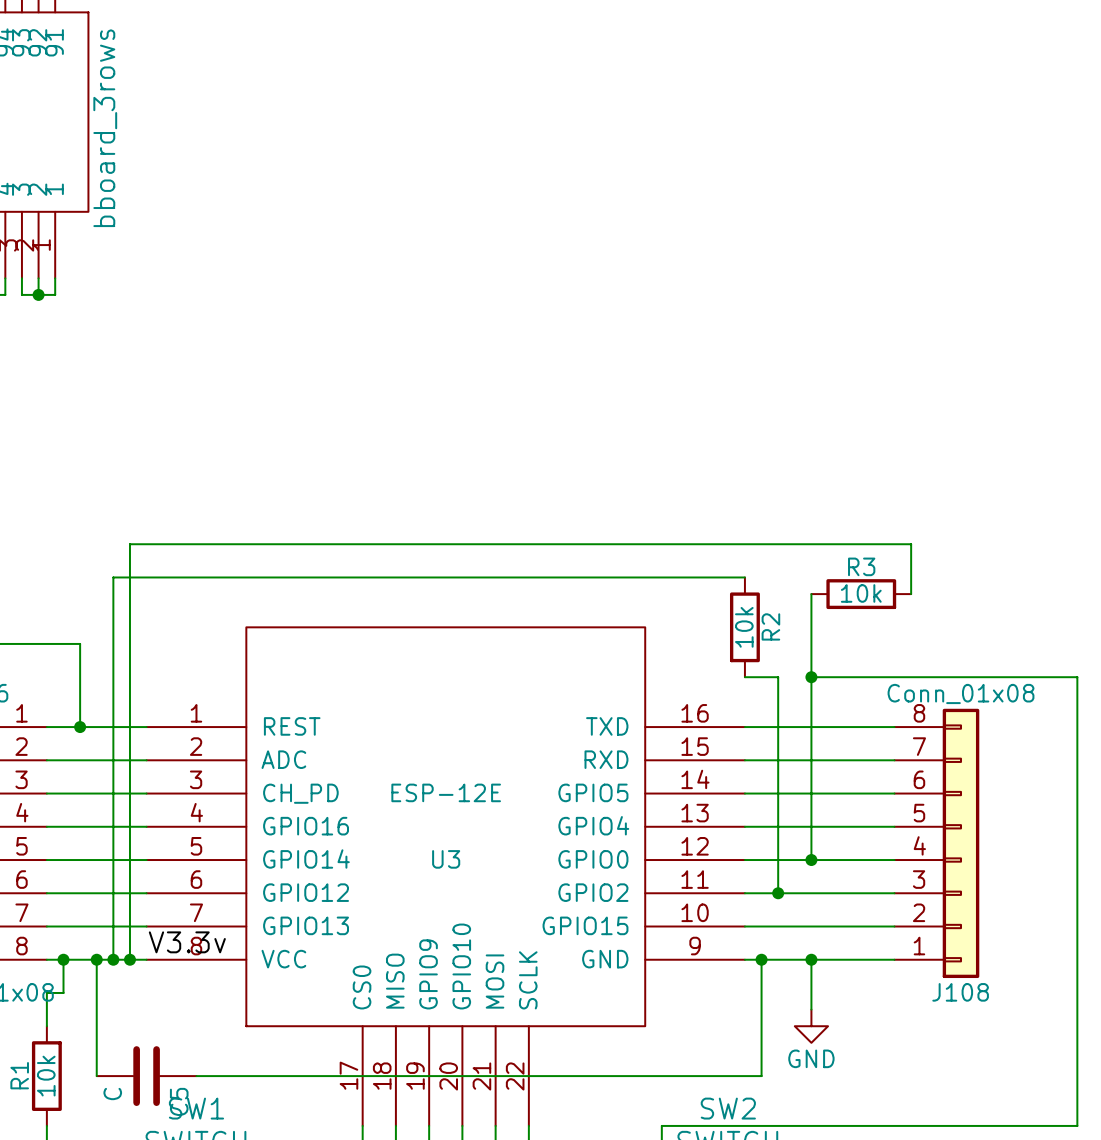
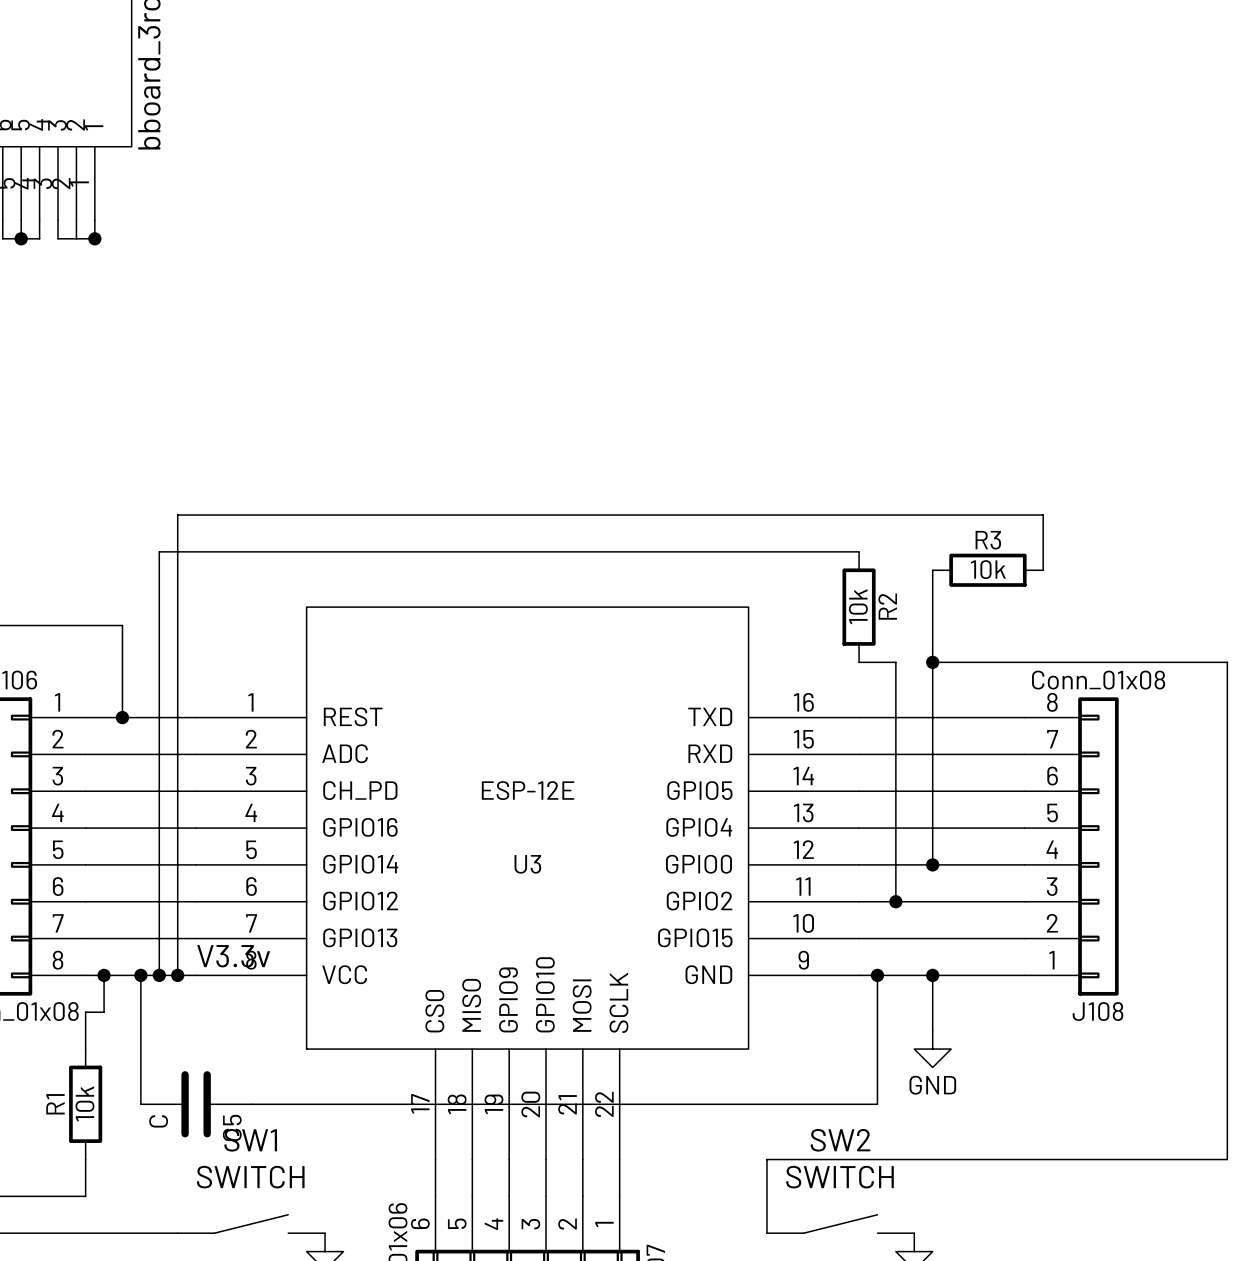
junction position: (38, 294) -> (94, 238)

